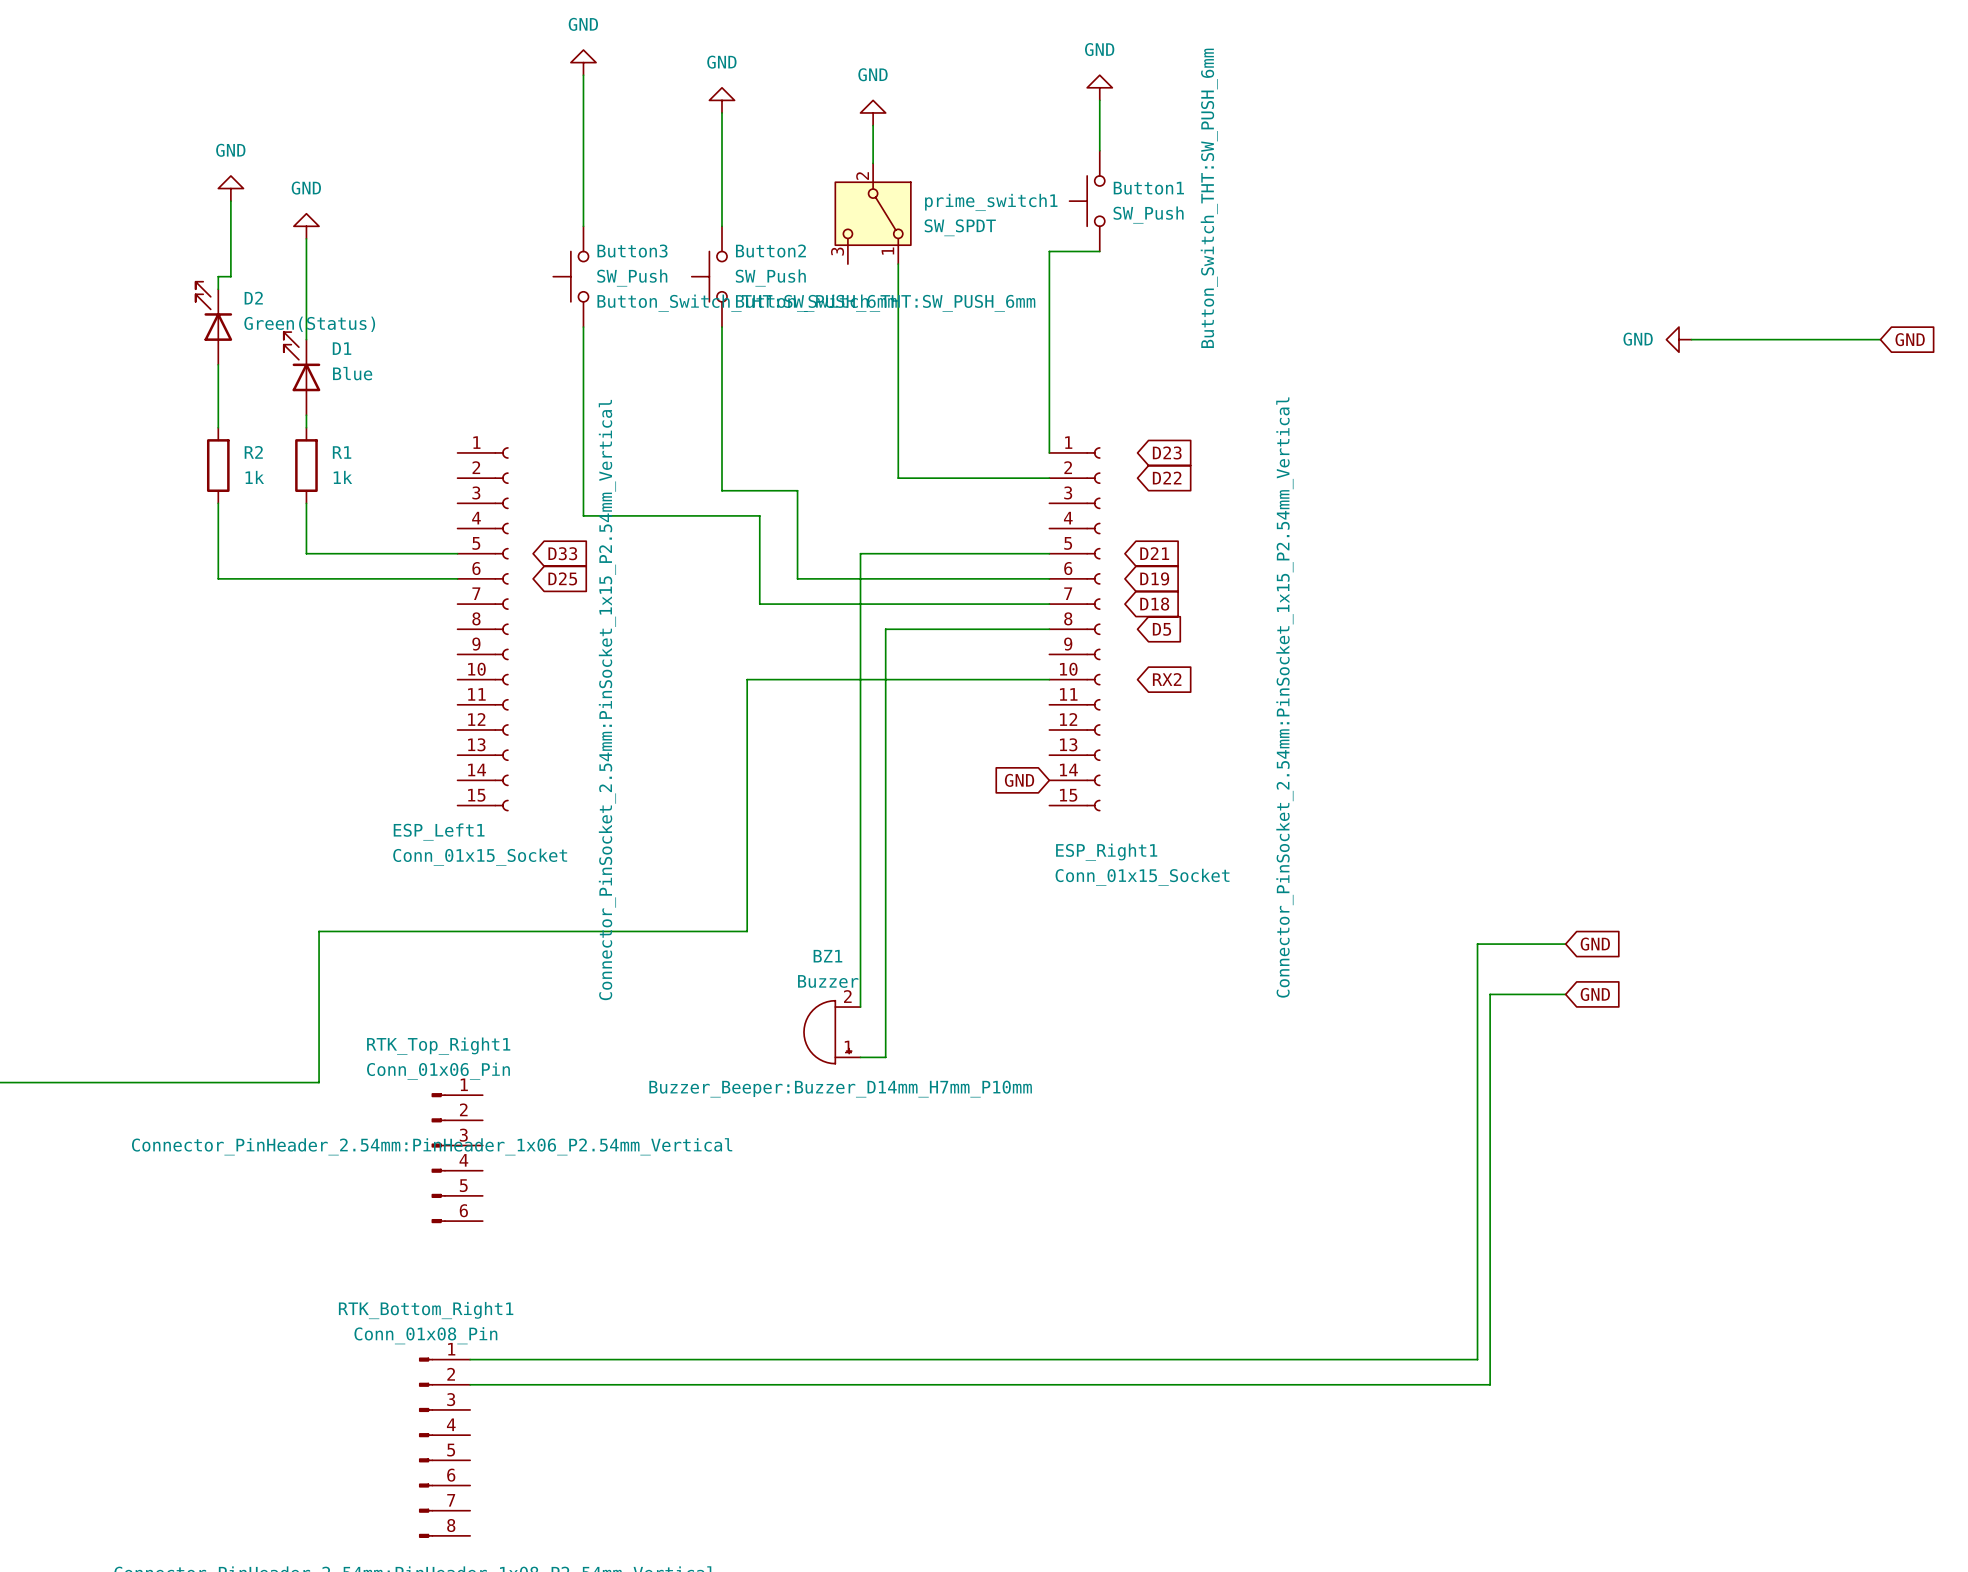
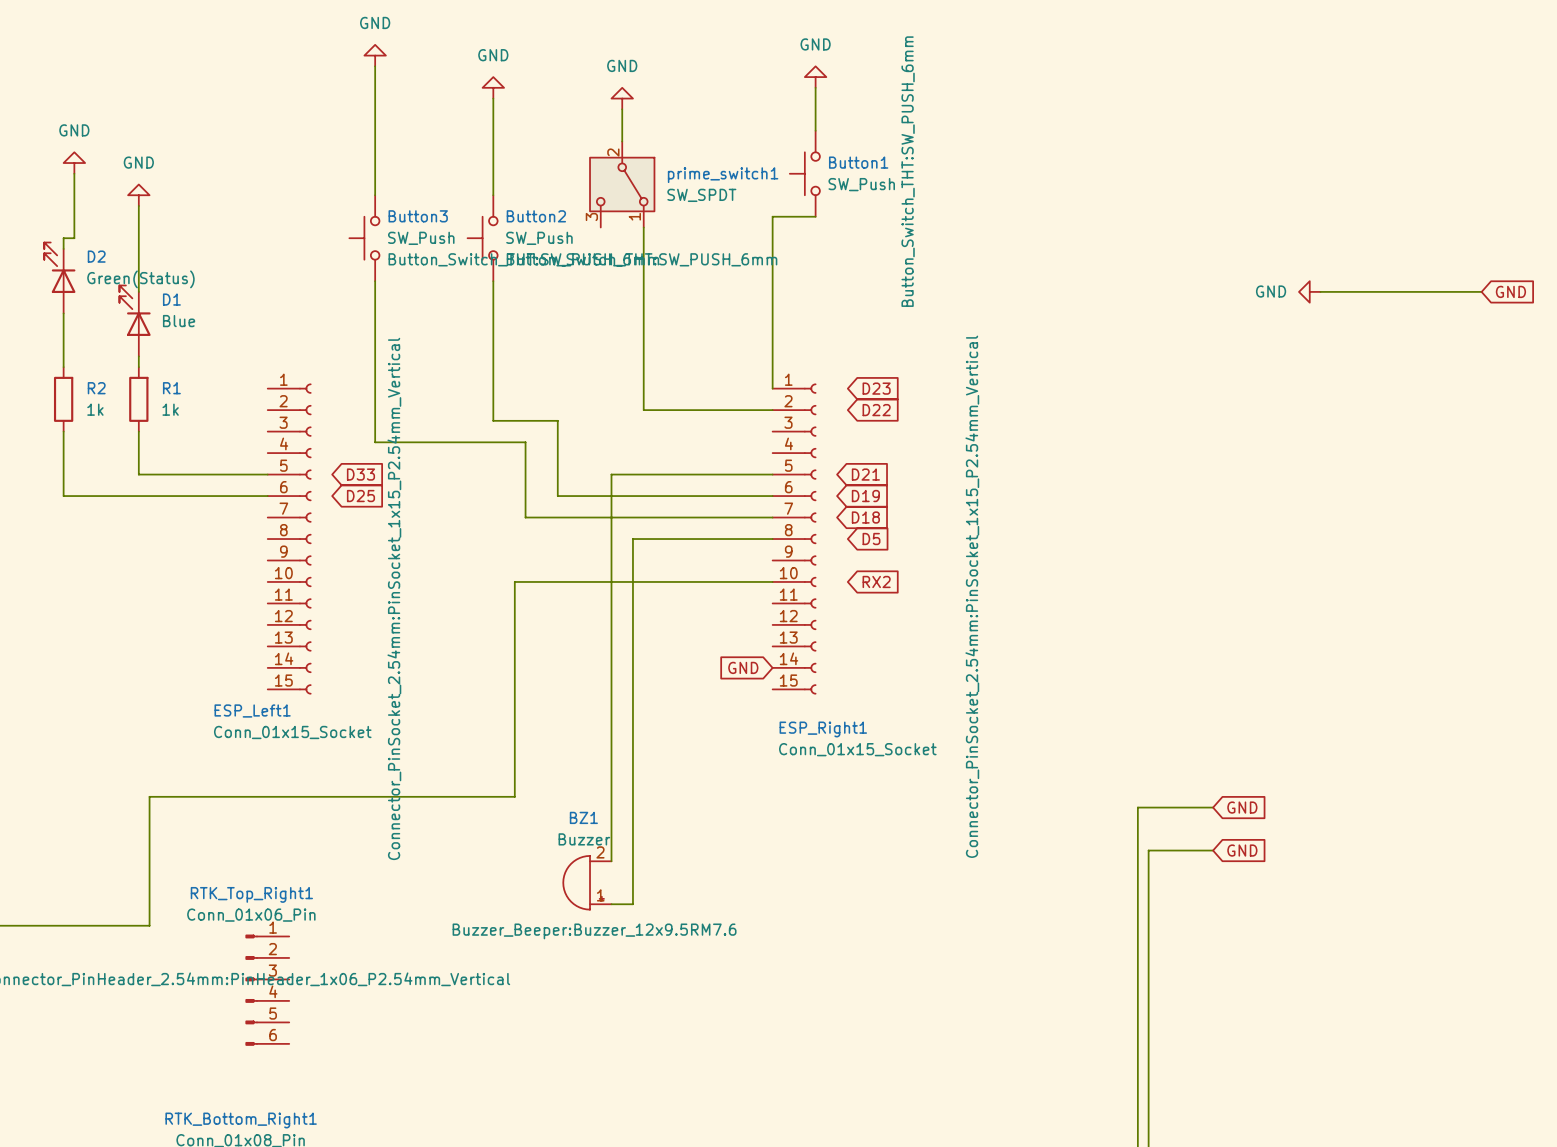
BZ1 text: Buzzer_Beeper:Buzzer_D14mm_H7mm_P10mm (840, 1089) -> Buzzer_Beeper:Buzzer_12x9.5RM7.6 (594, 931)

